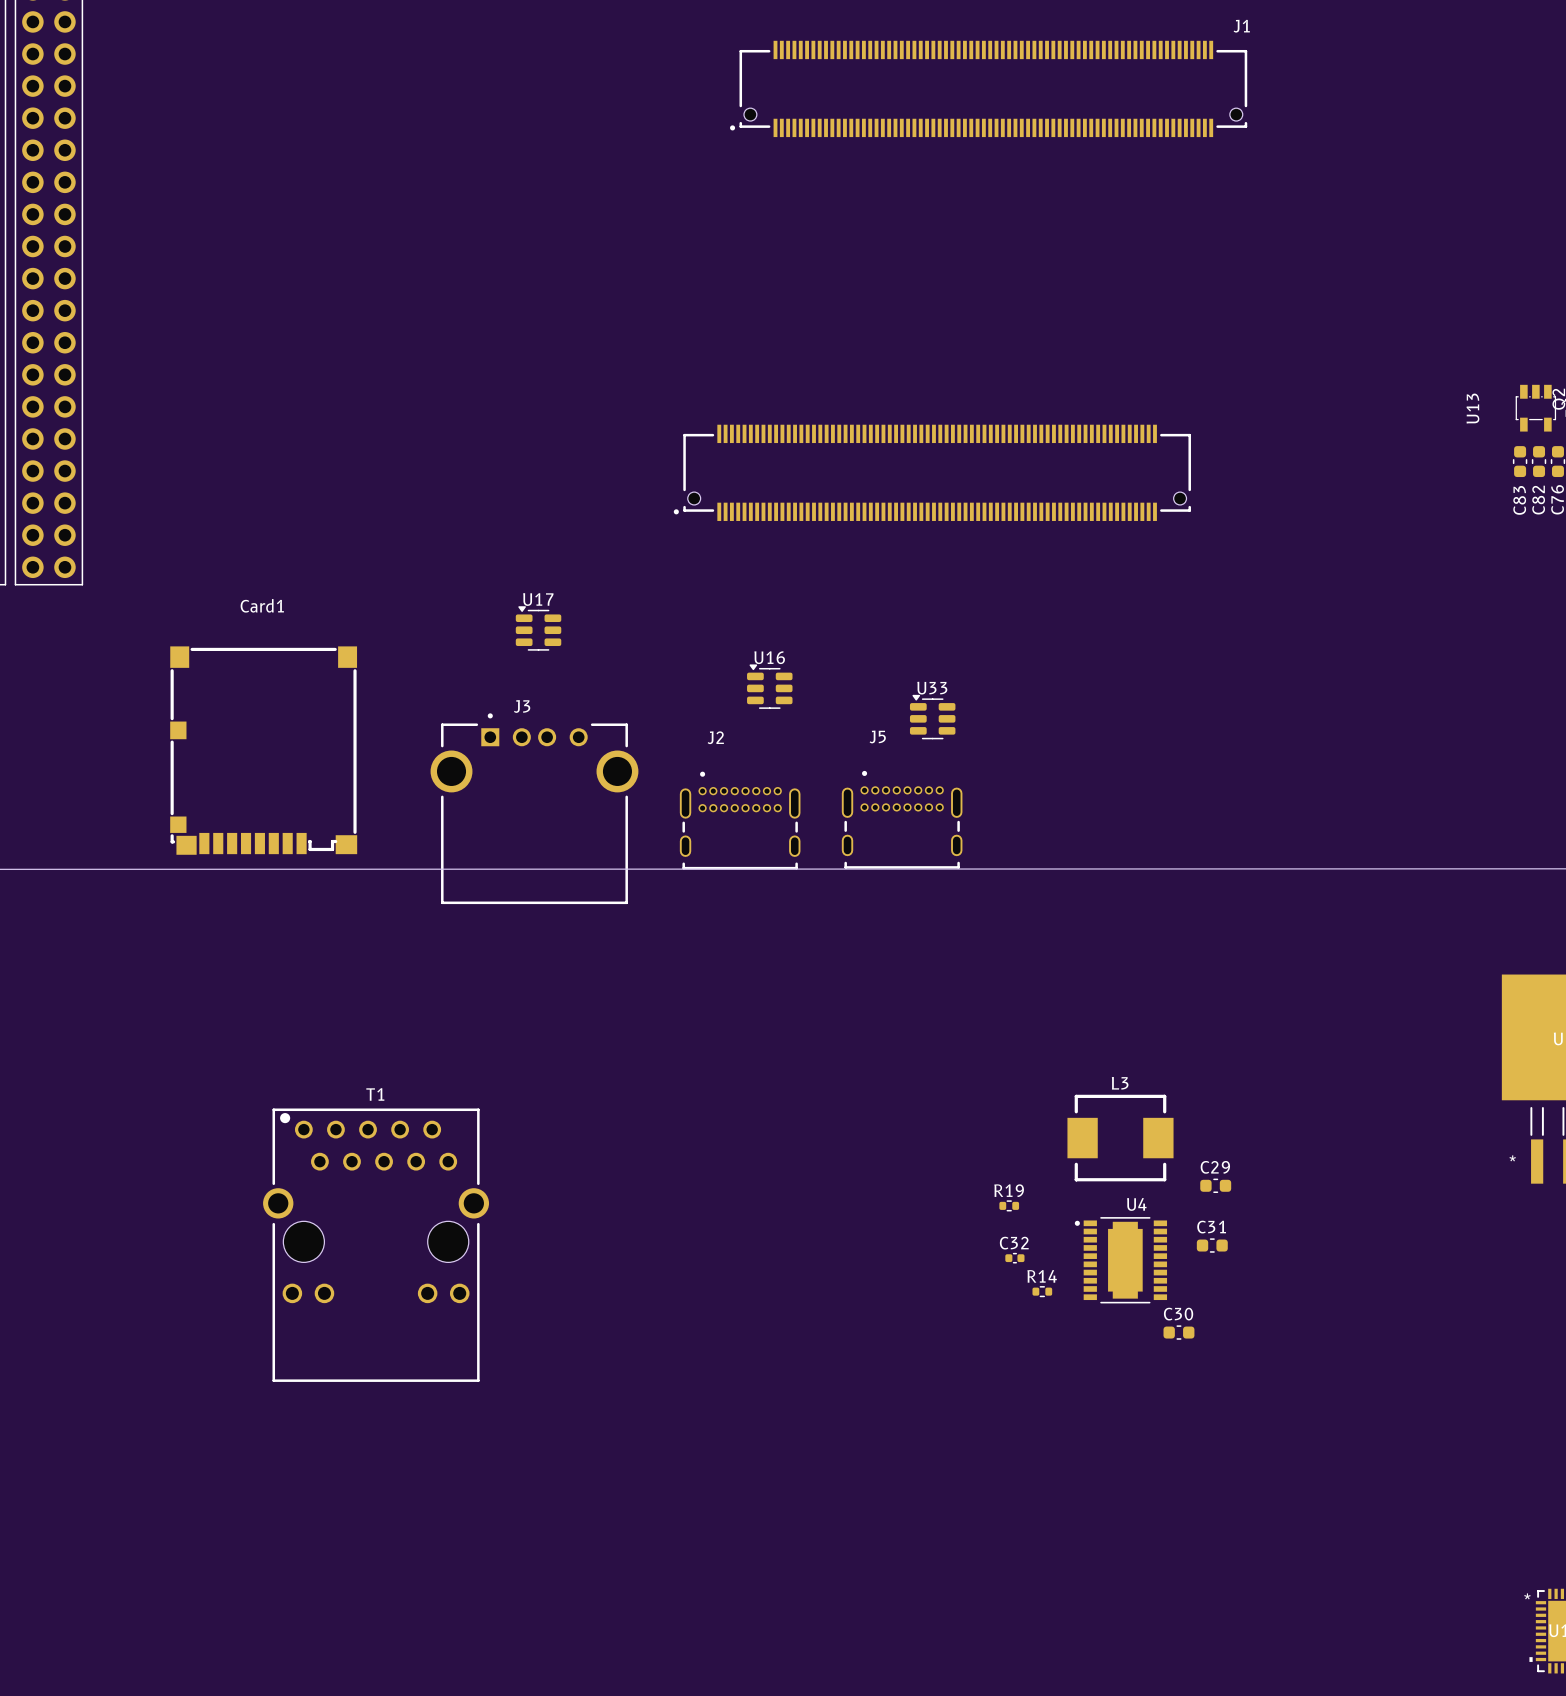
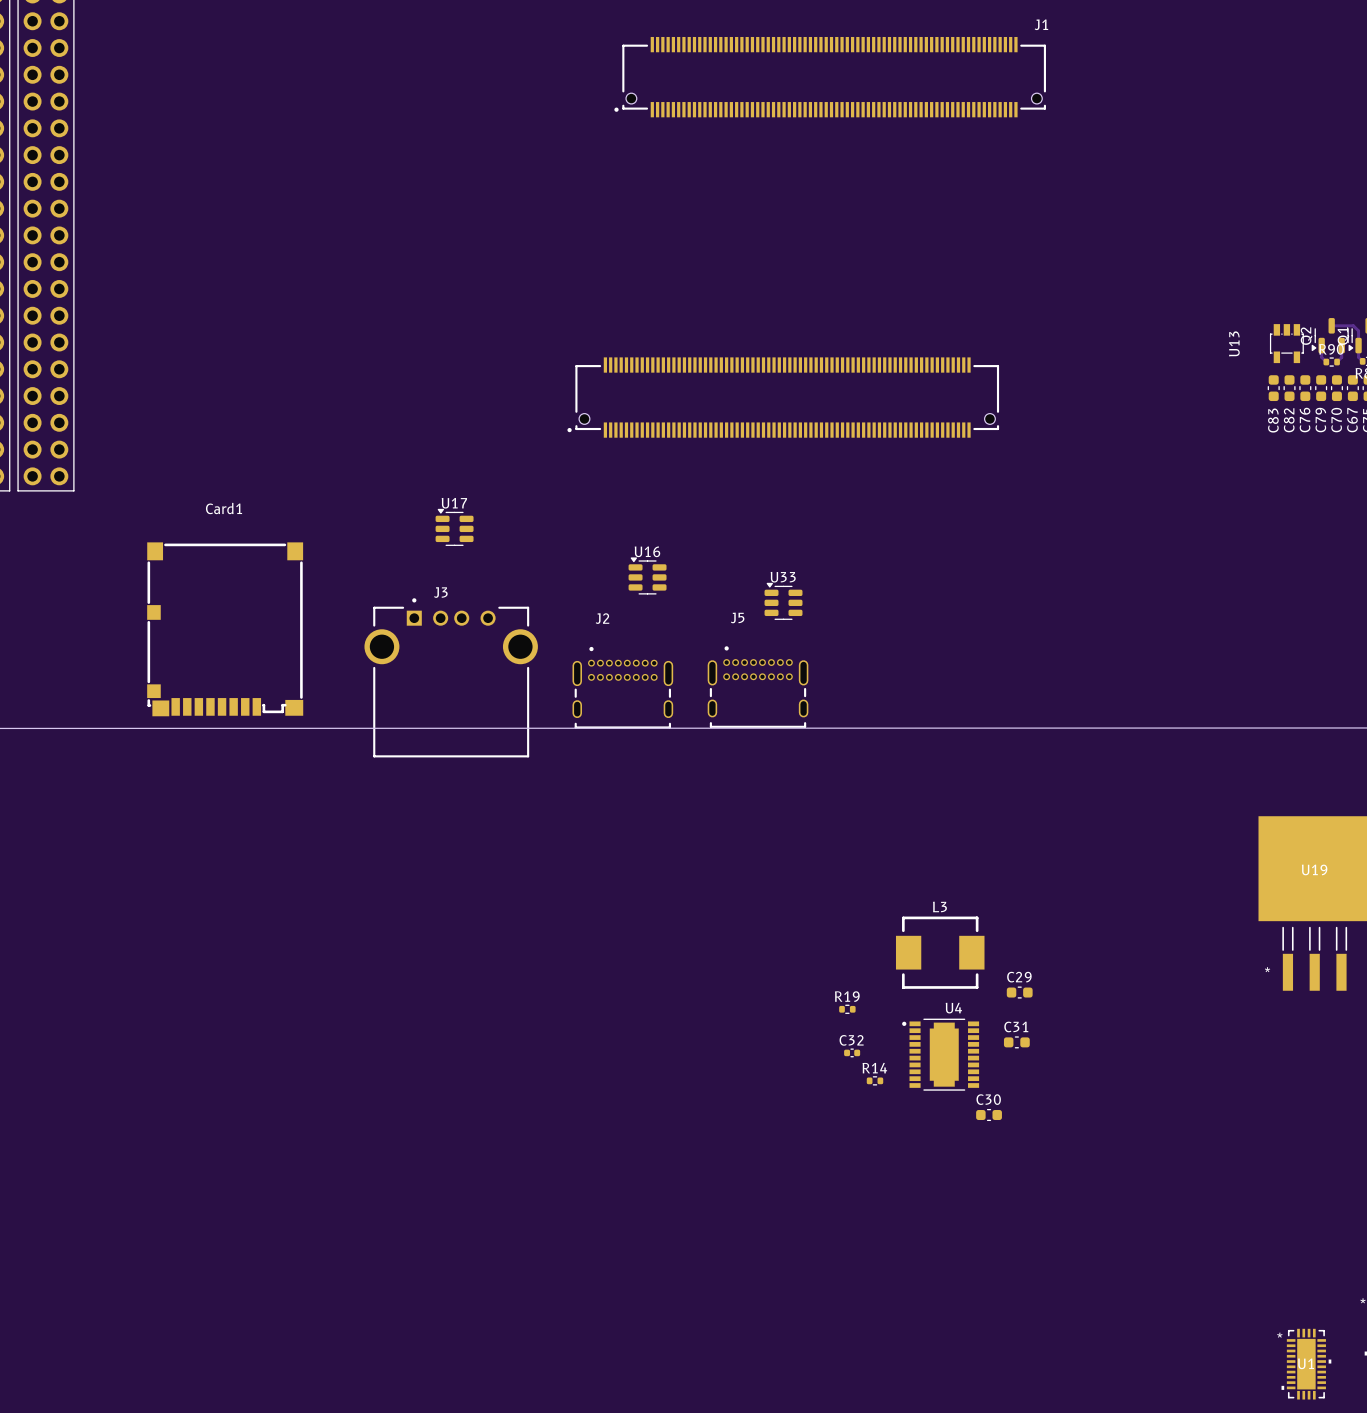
T1: (376, 1245) -> none

